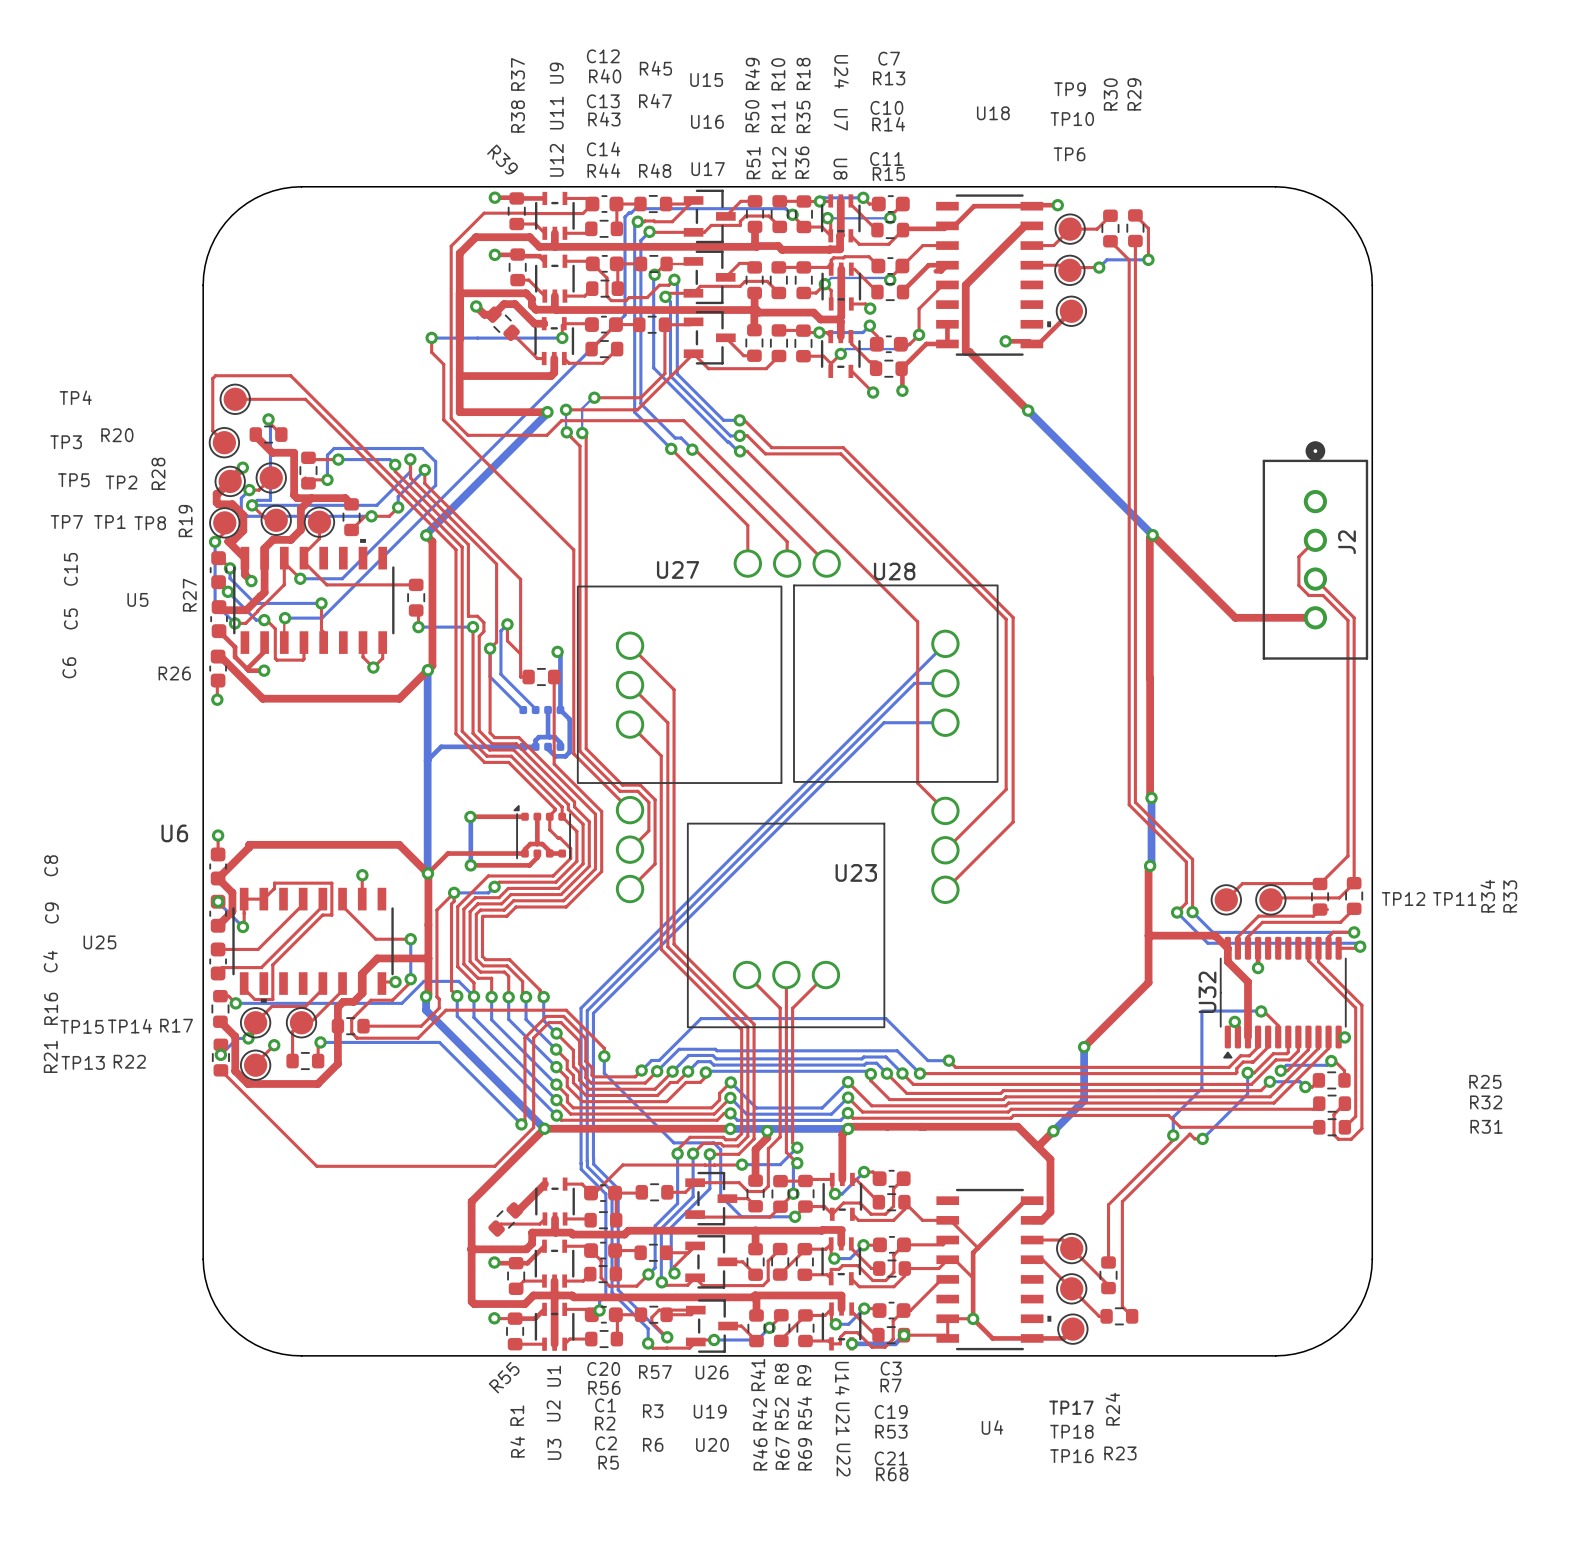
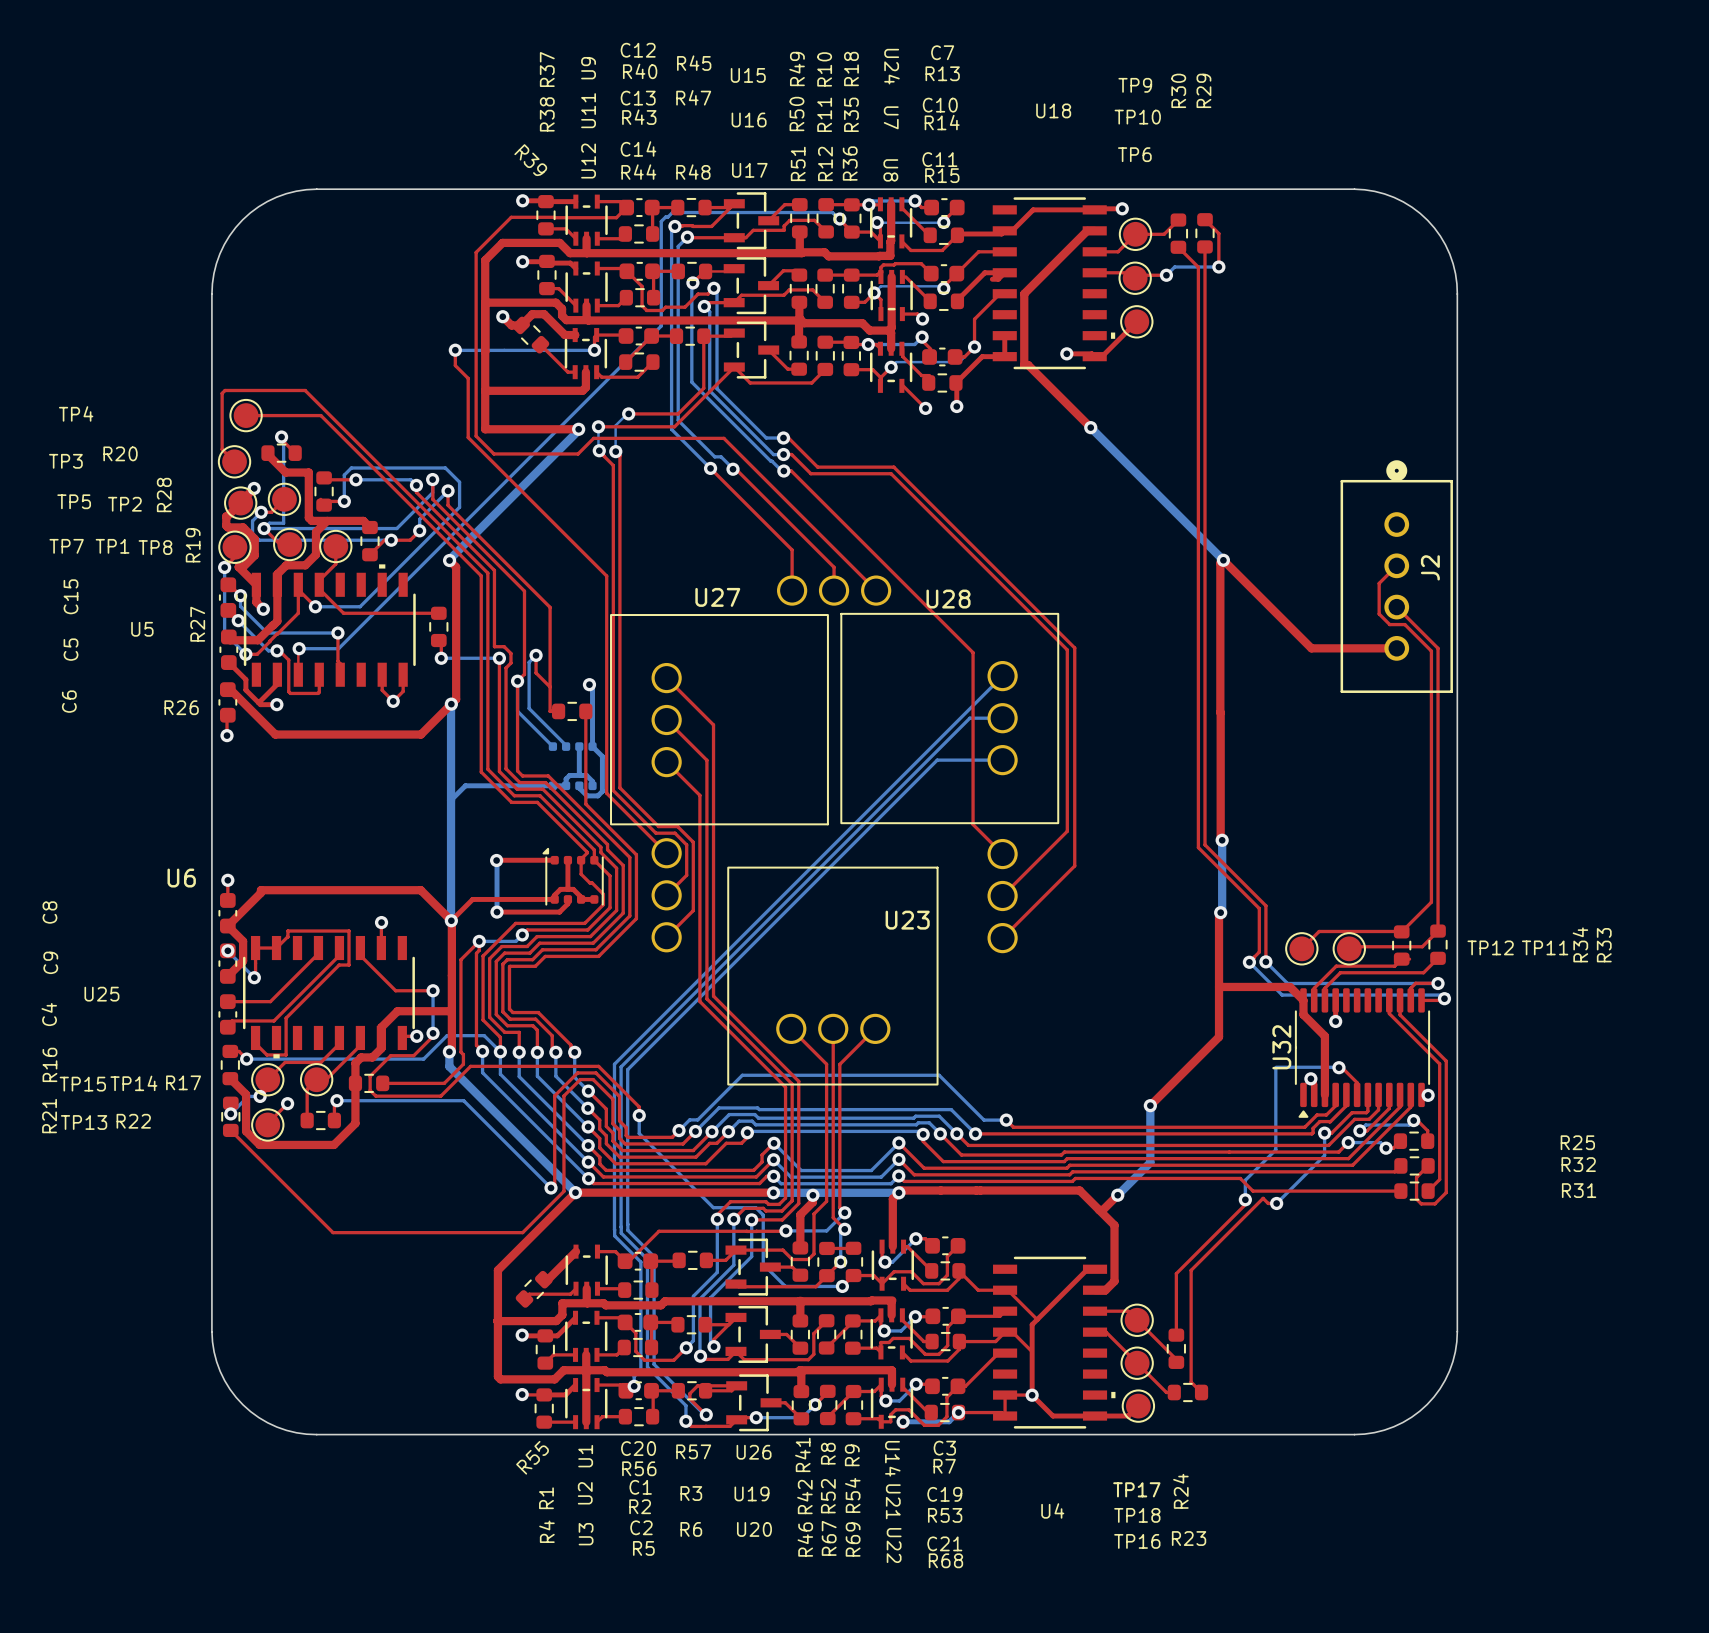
top track: (832, 1179) (805, 1180) -> none

